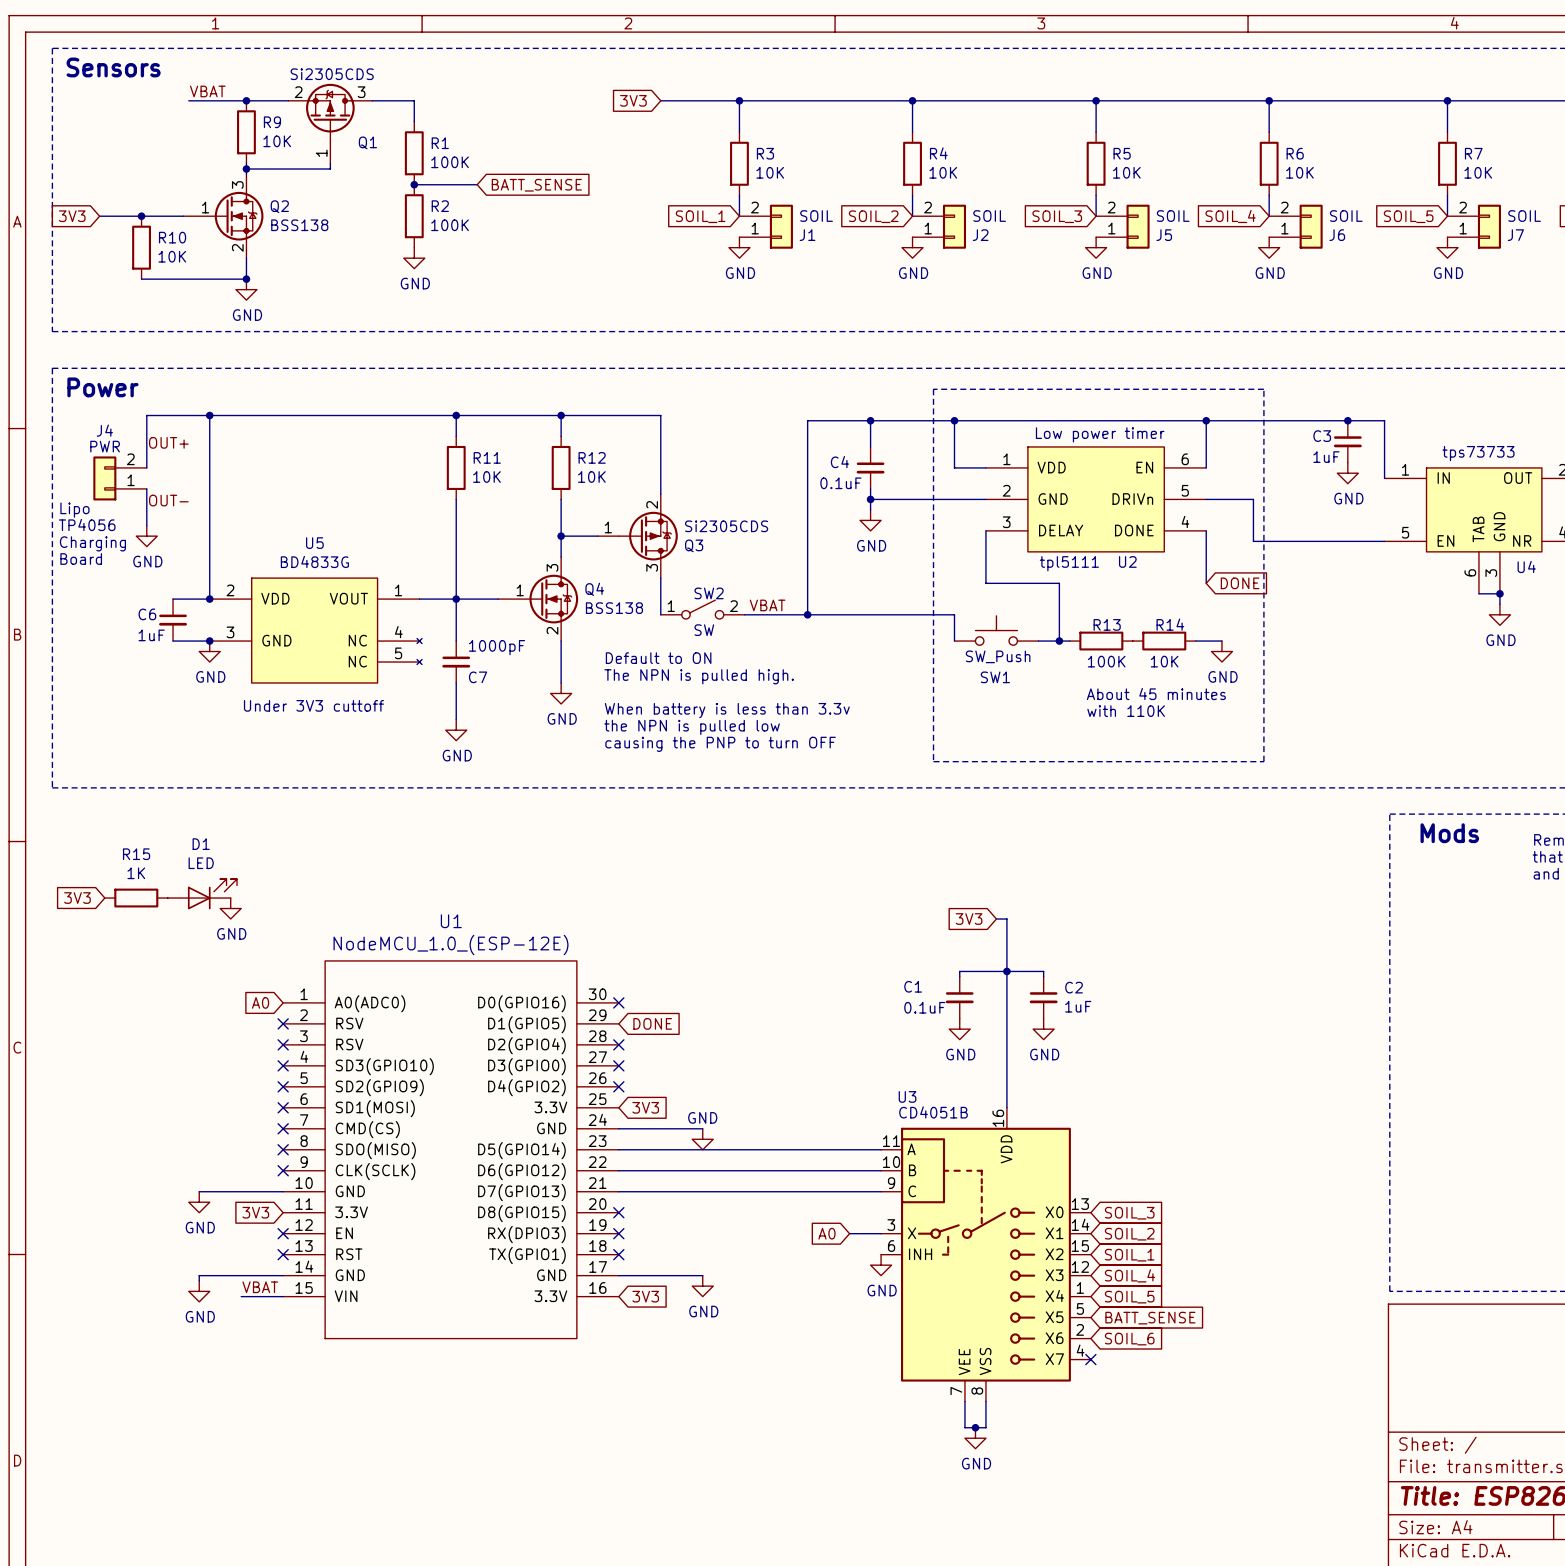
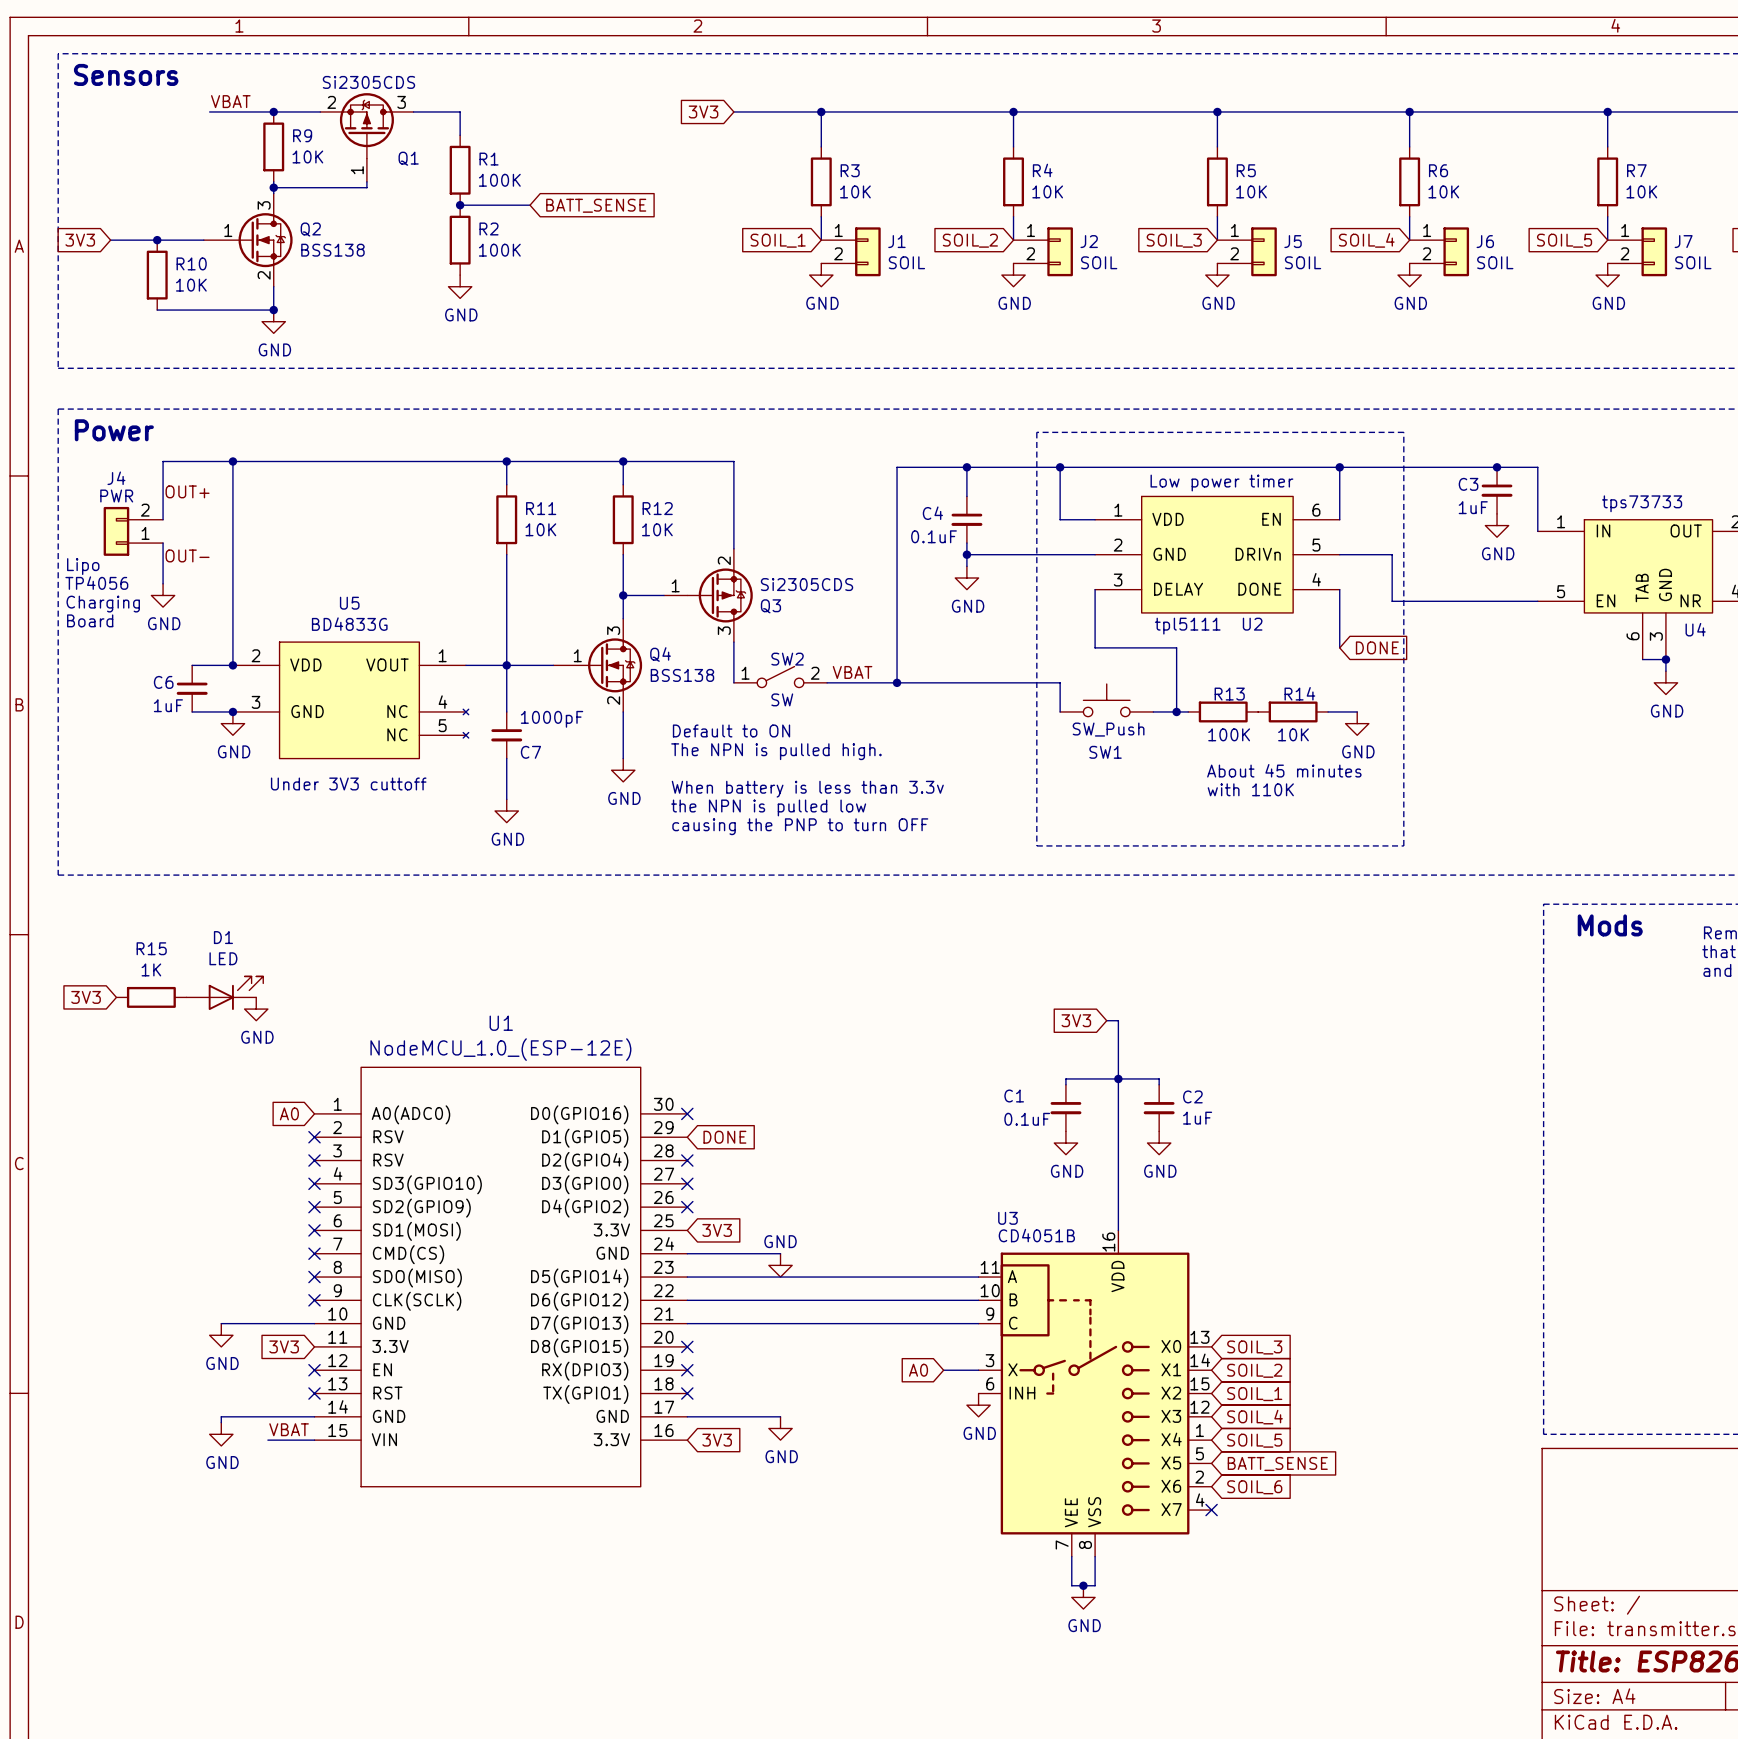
J1 flip: as is (781, 226) -> up-down (867, 251)
J2 flip: as is (954, 226) -> up-down (1060, 251)
J5 flip: as is (1138, 226) -> up-down (1264, 251)
J6 flip: as is (1311, 226) -> up-down (1456, 251)
J7 flip: as is (1489, 226) -> up-down (1654, 251)

